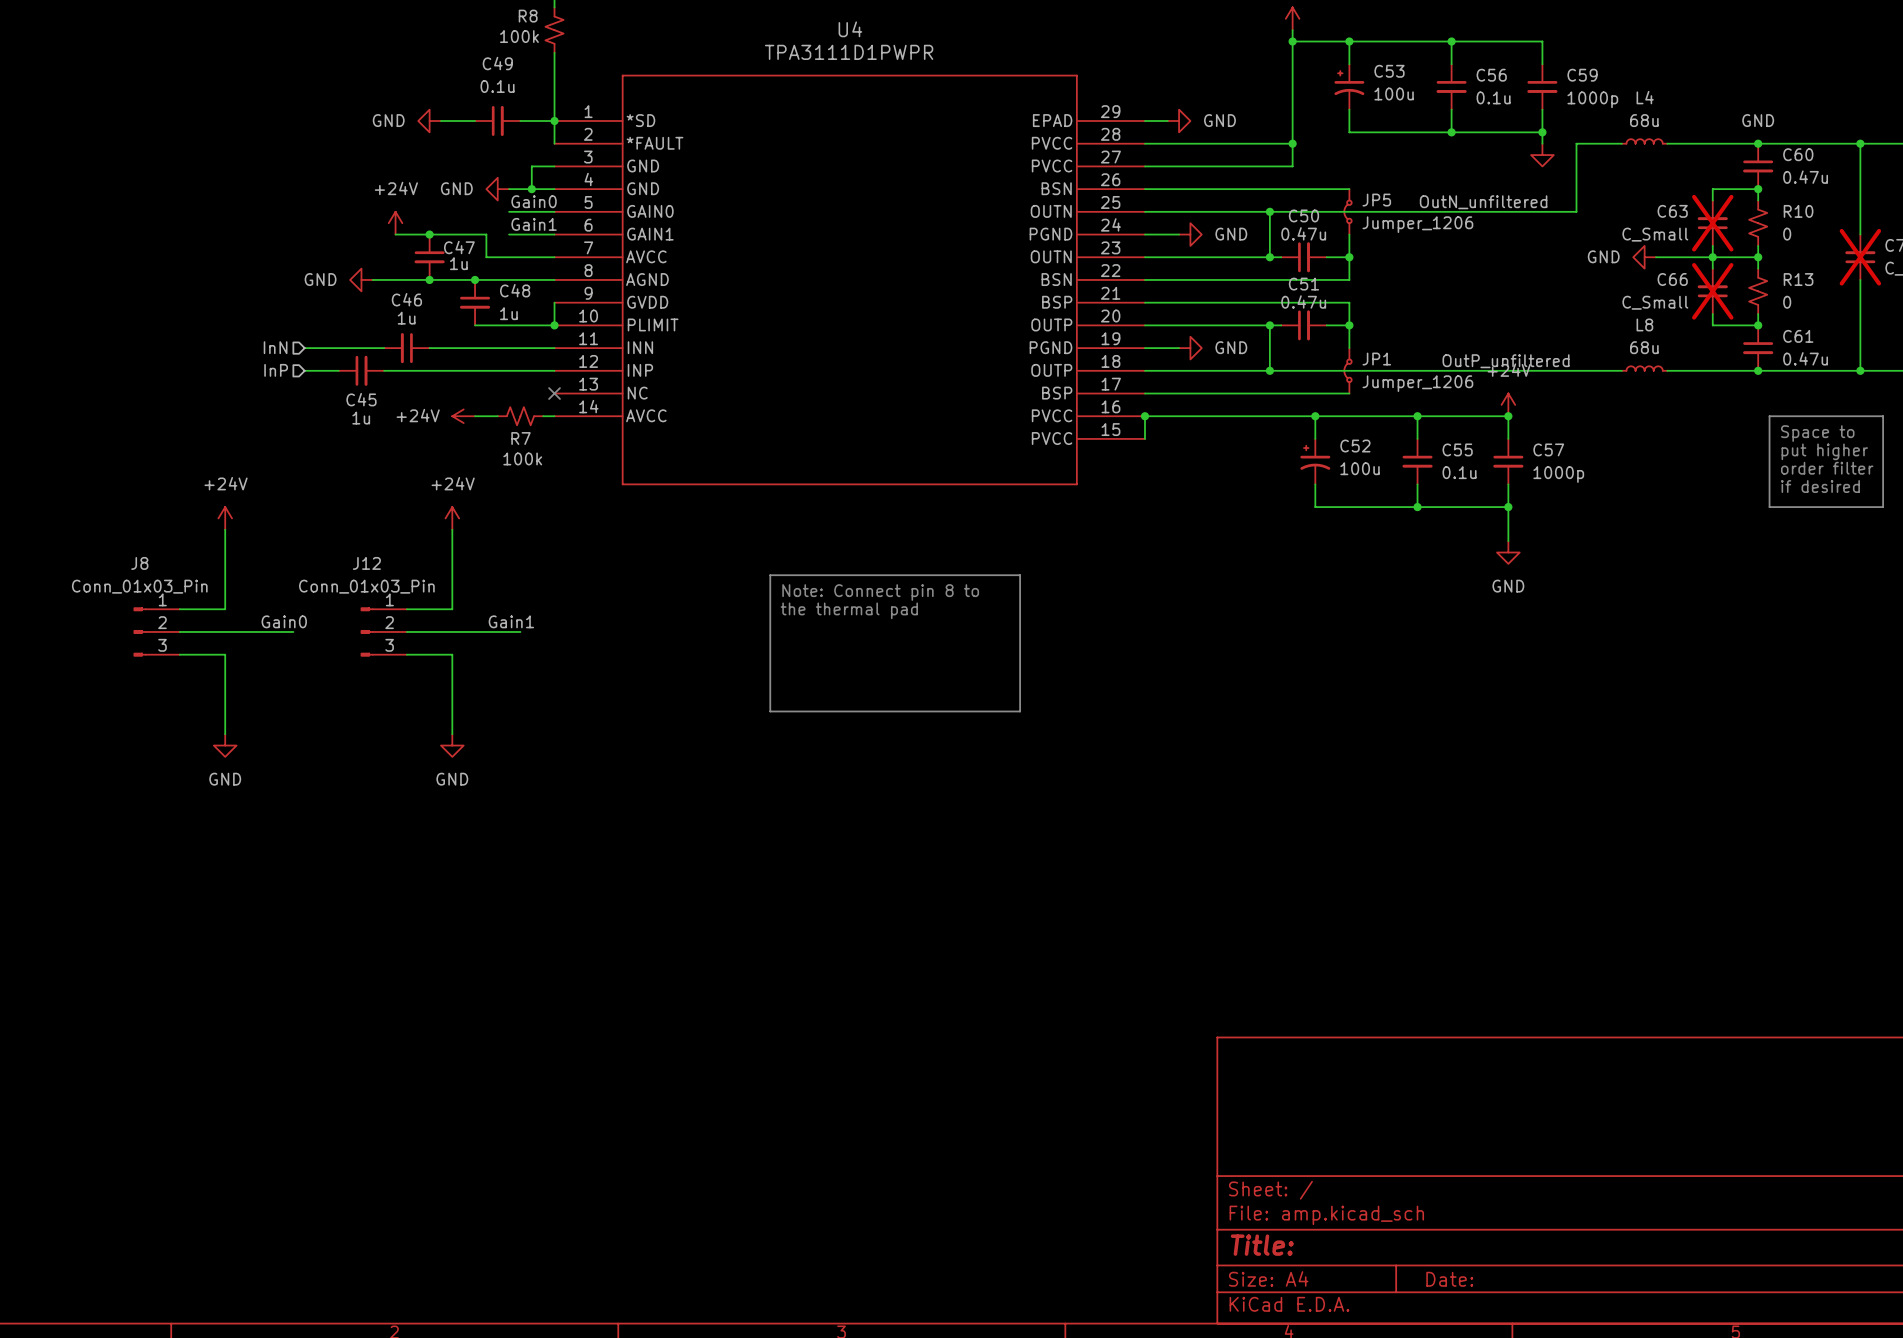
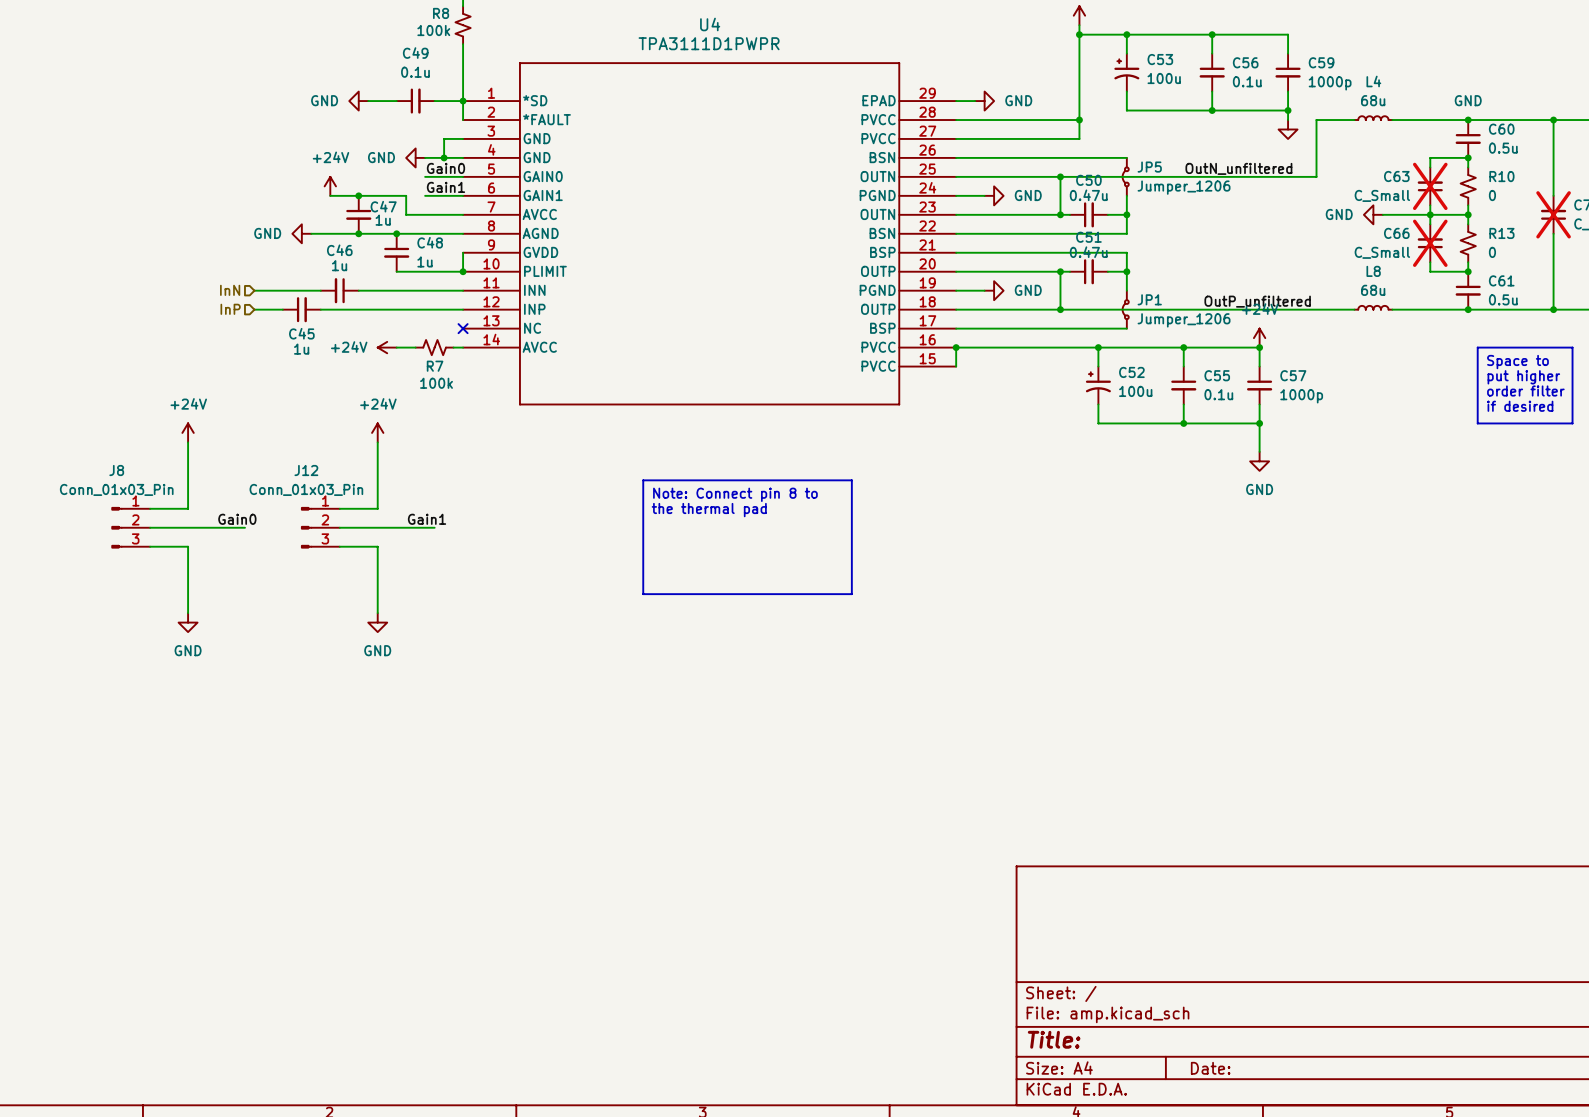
C60 value: 0.47u (1805, 177) -> 0.5u (1503, 148)
C61 value: 0.47u (1805, 358) -> 0.5u (1503, 299)

